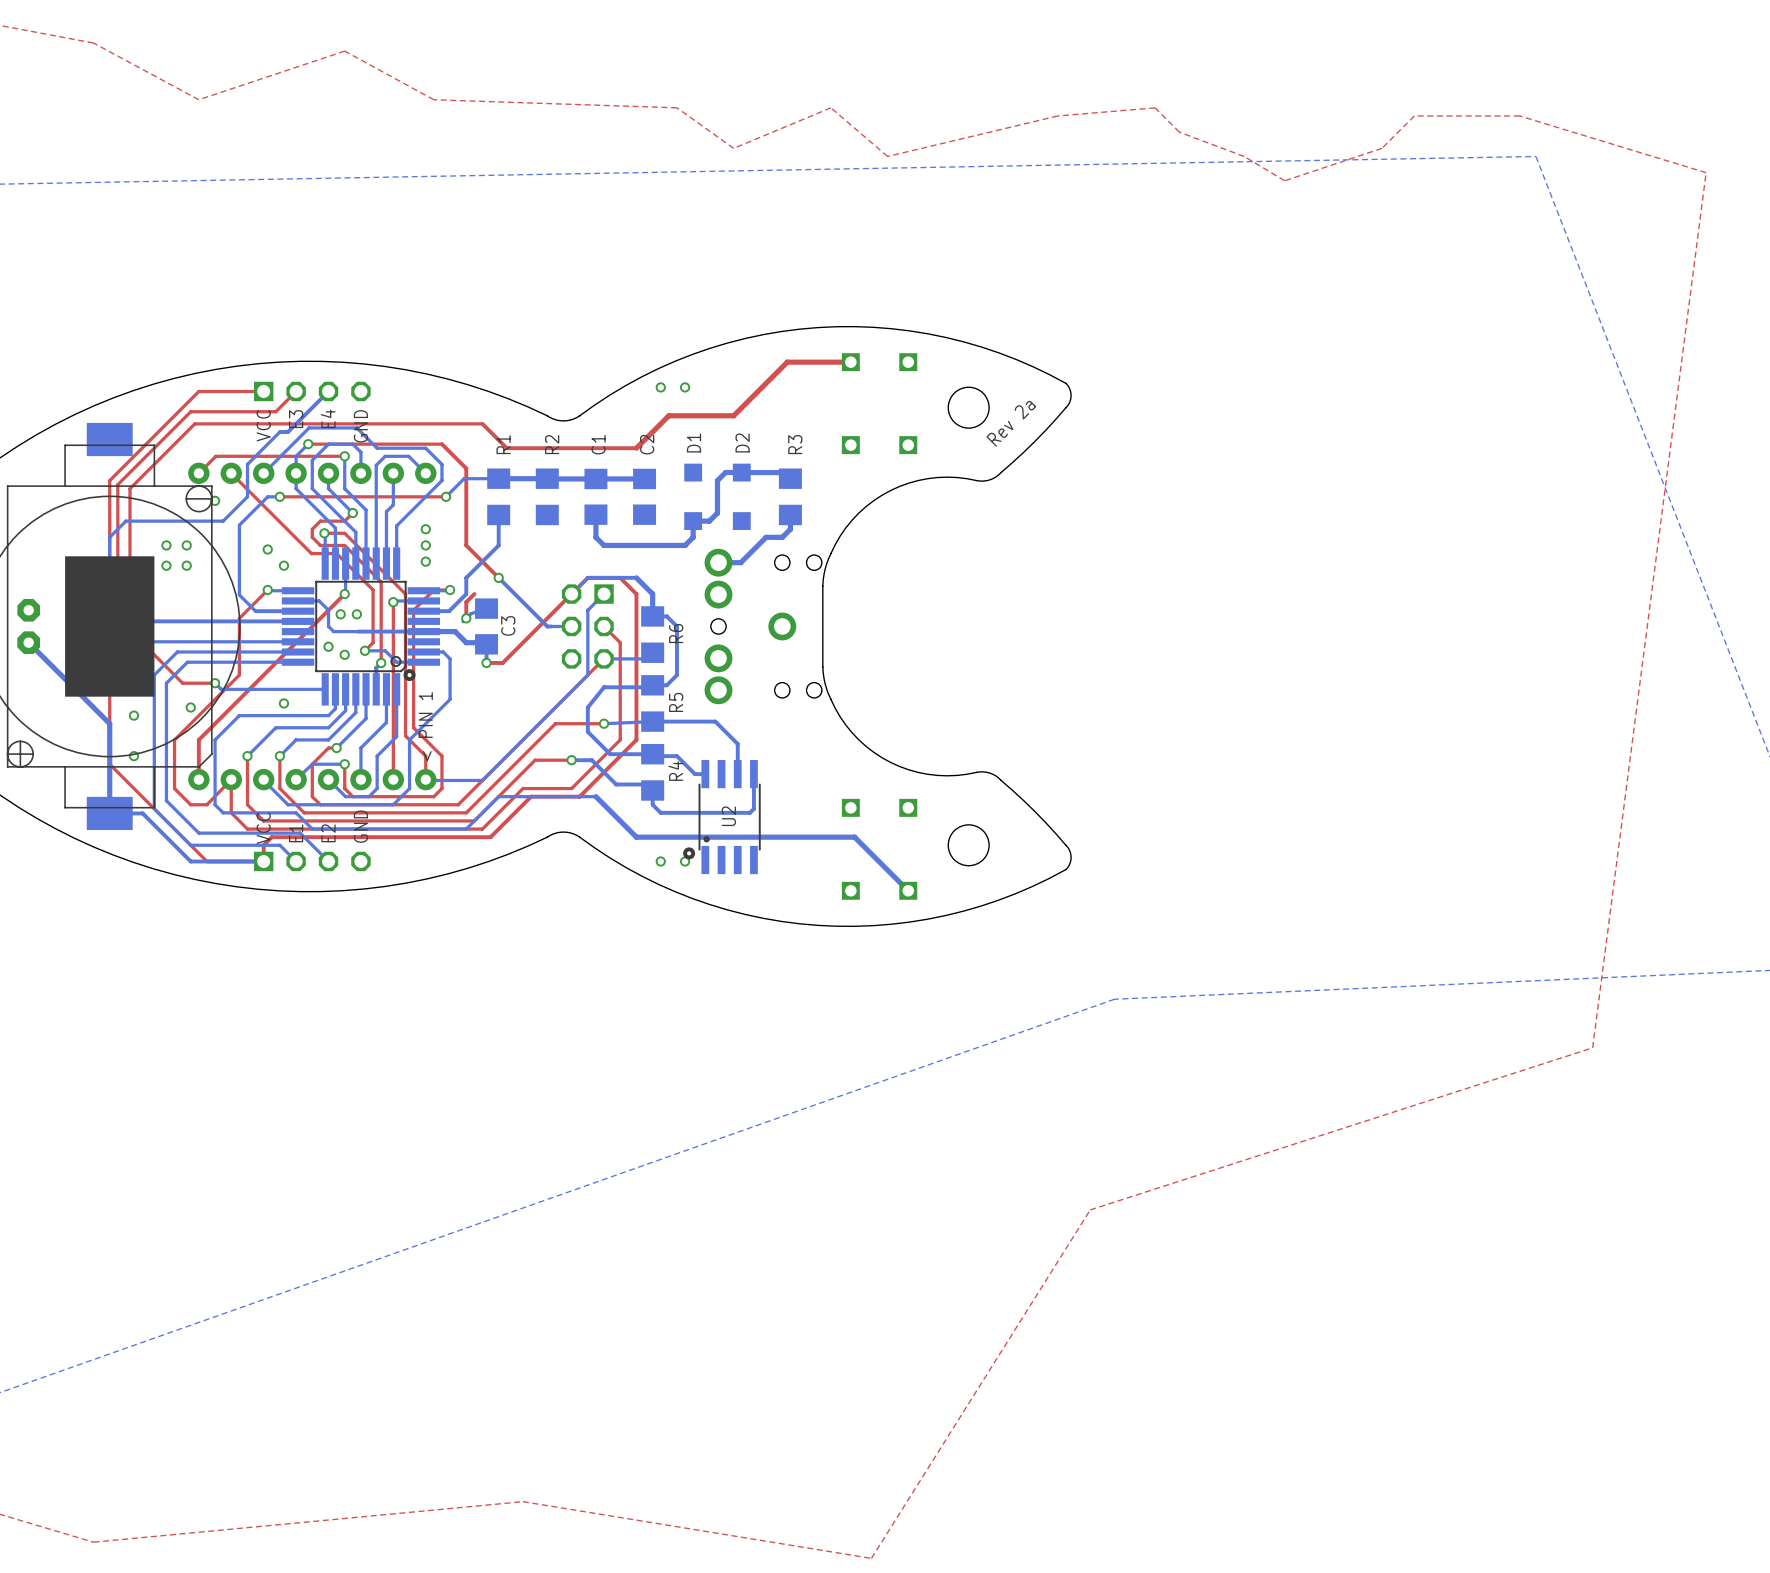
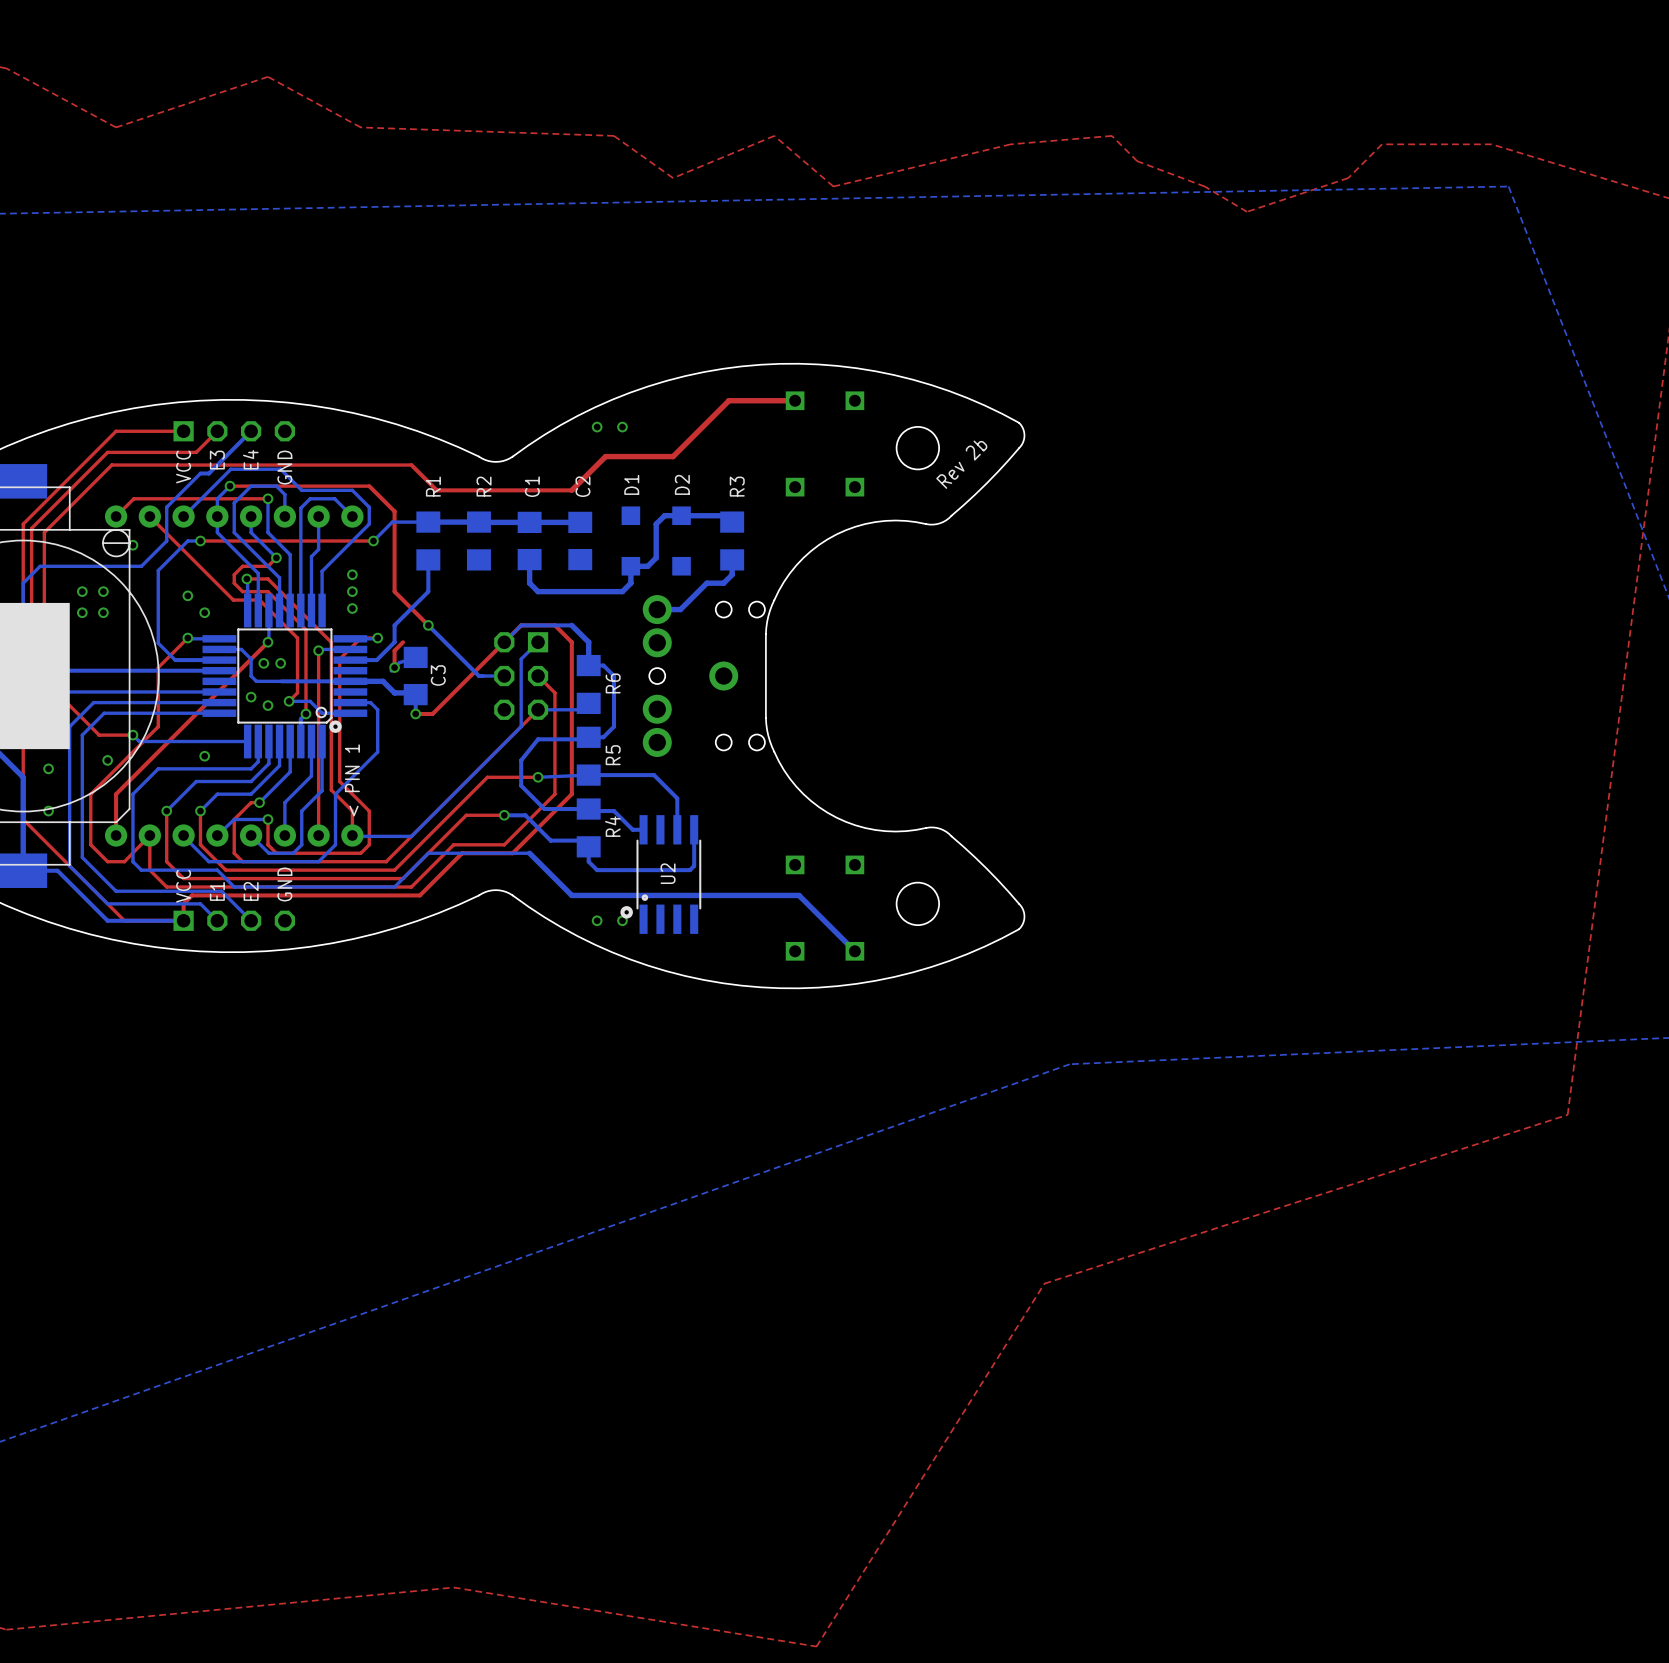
text: Rev 2a (1011, 423) -> Rev 2b (961, 464)

